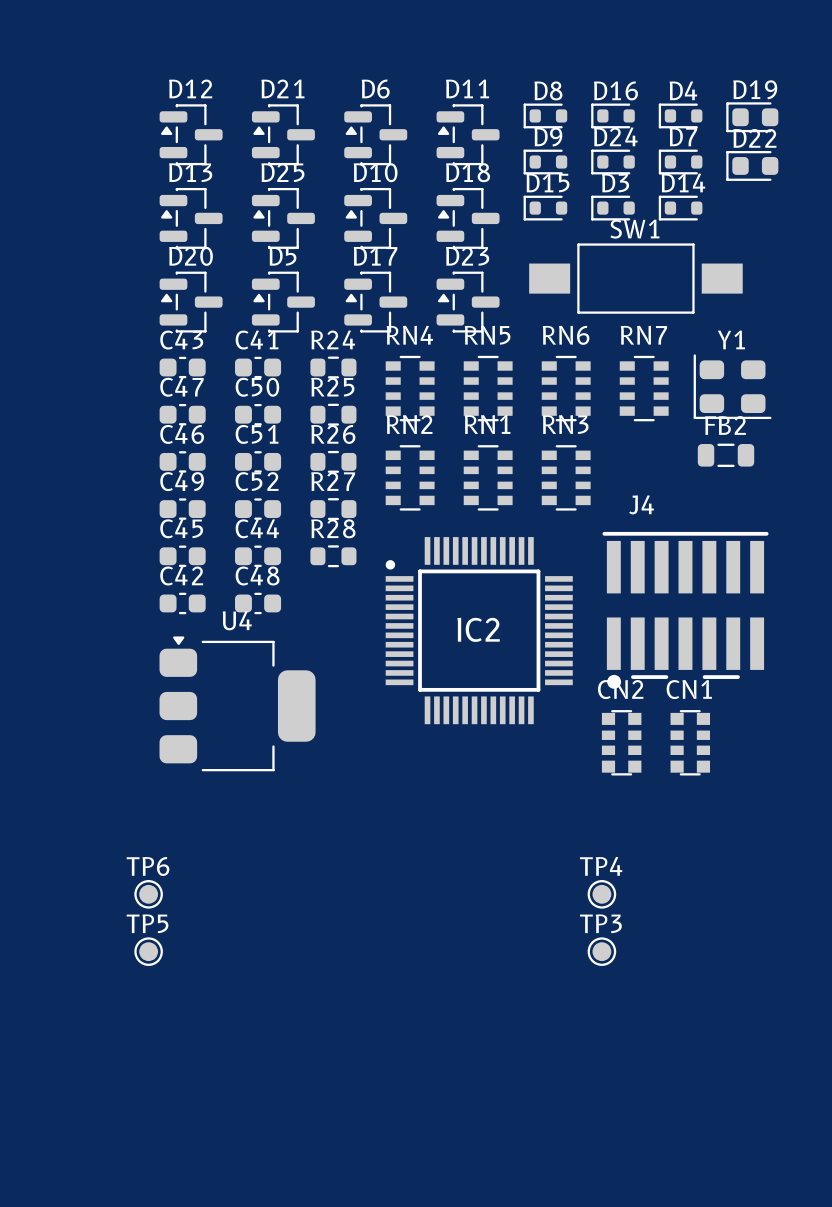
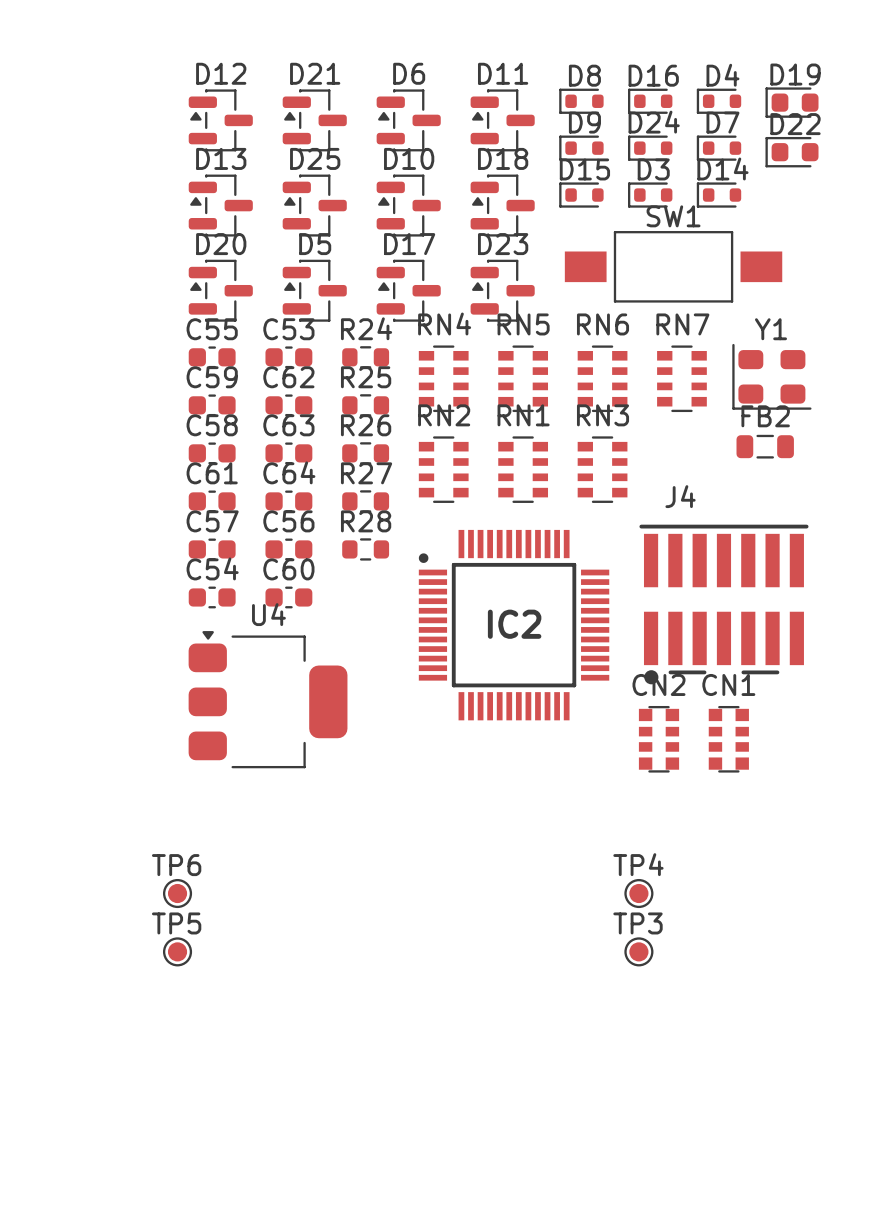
C43 name: C43 (181, 340) -> C55 (212, 329)
C41 name: C41 (257, 340) -> C53 (288, 329)
C47 name: C47 (181, 387) -> C59 (212, 377)
C50 name: C50 (257, 387) -> C62 (288, 377)
C46 name: C46 (182, 434) -> C58 (212, 425)
C51 name: C51 (257, 434) -> C63 (288, 425)
C49 name: C49 (182, 481) -> C61 (212, 473)
C52 name: C52 (257, 481) -> C64 (289, 472)
C45 name: C45 (181, 528) -> C57 (212, 521)
C44 name: C44 (257, 528) -> C56 (288, 521)
C42 name: C42 (181, 575) -> C54 (212, 568)
C48 name: C48 (257, 575) -> C60 (288, 569)

